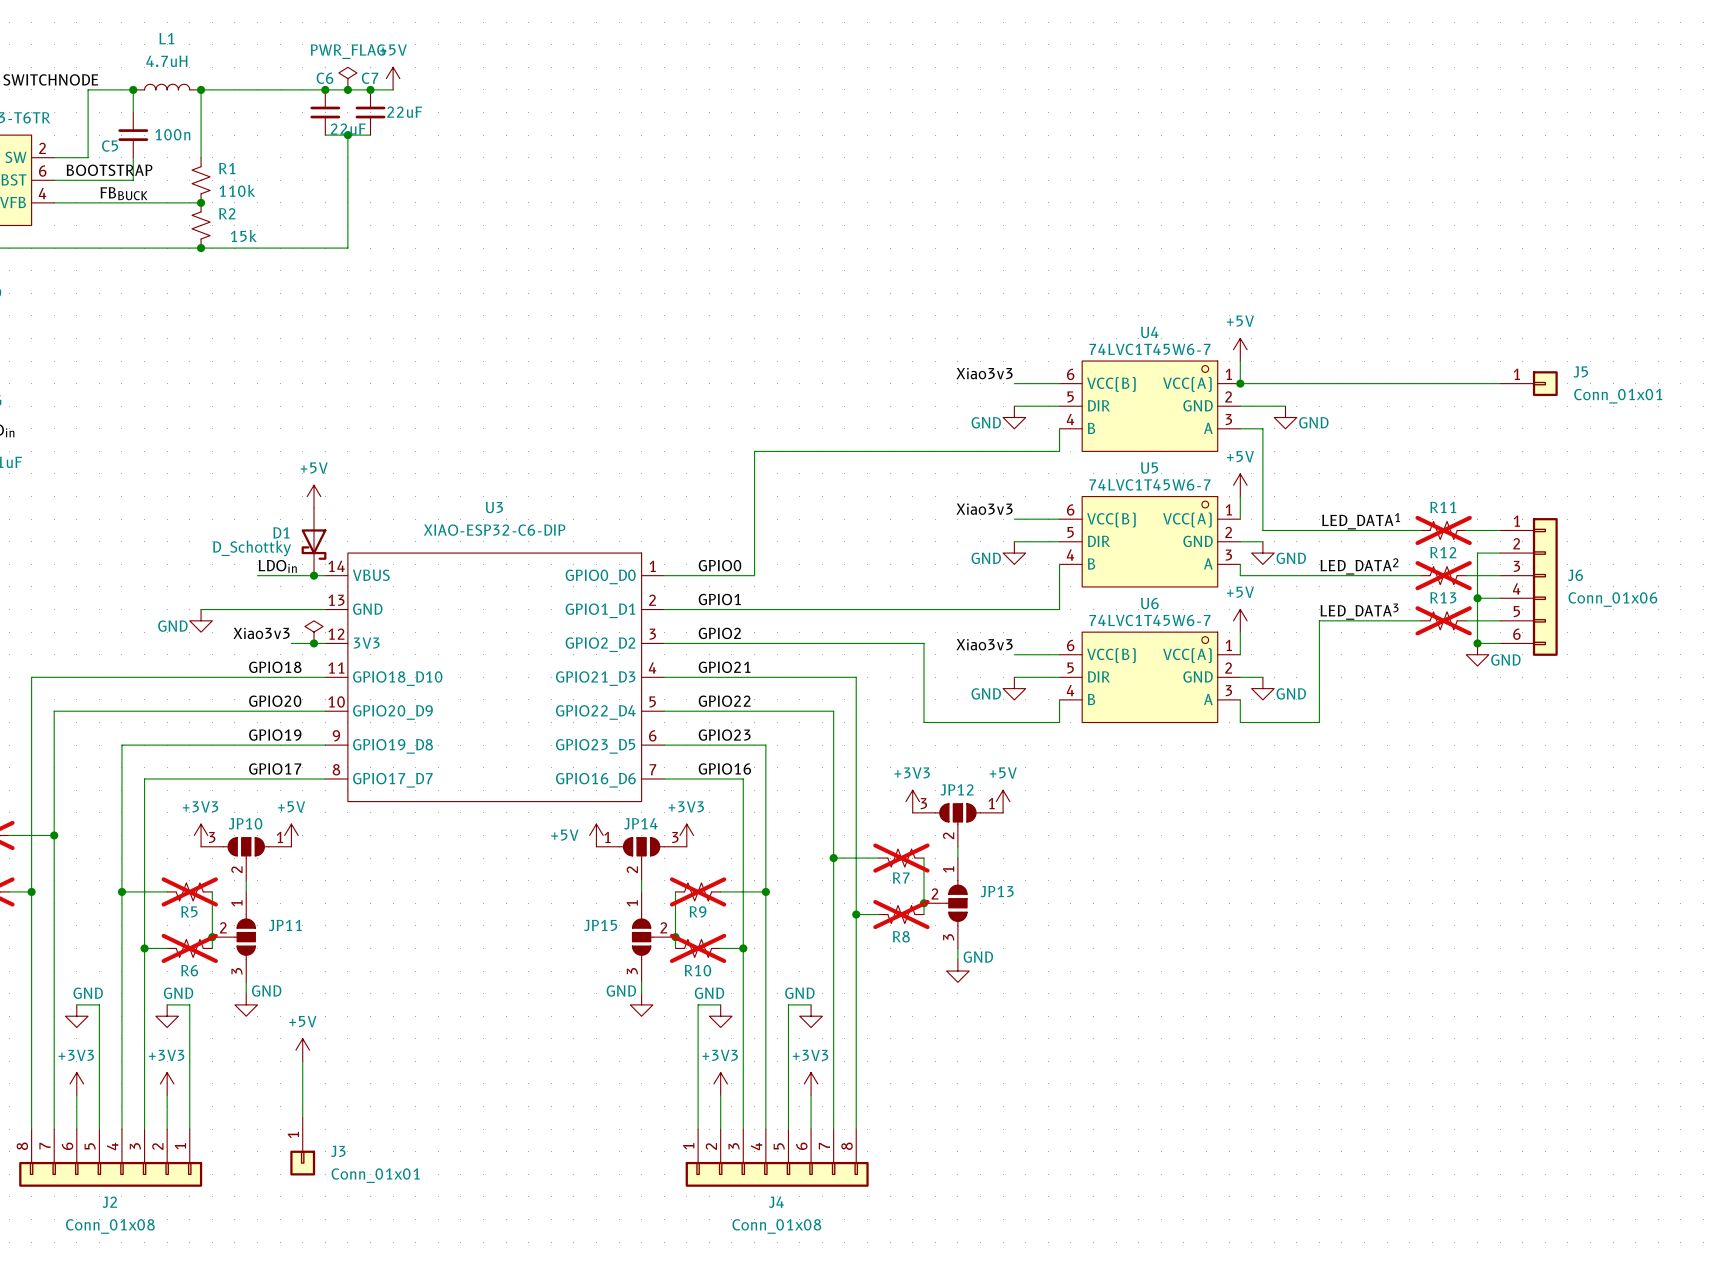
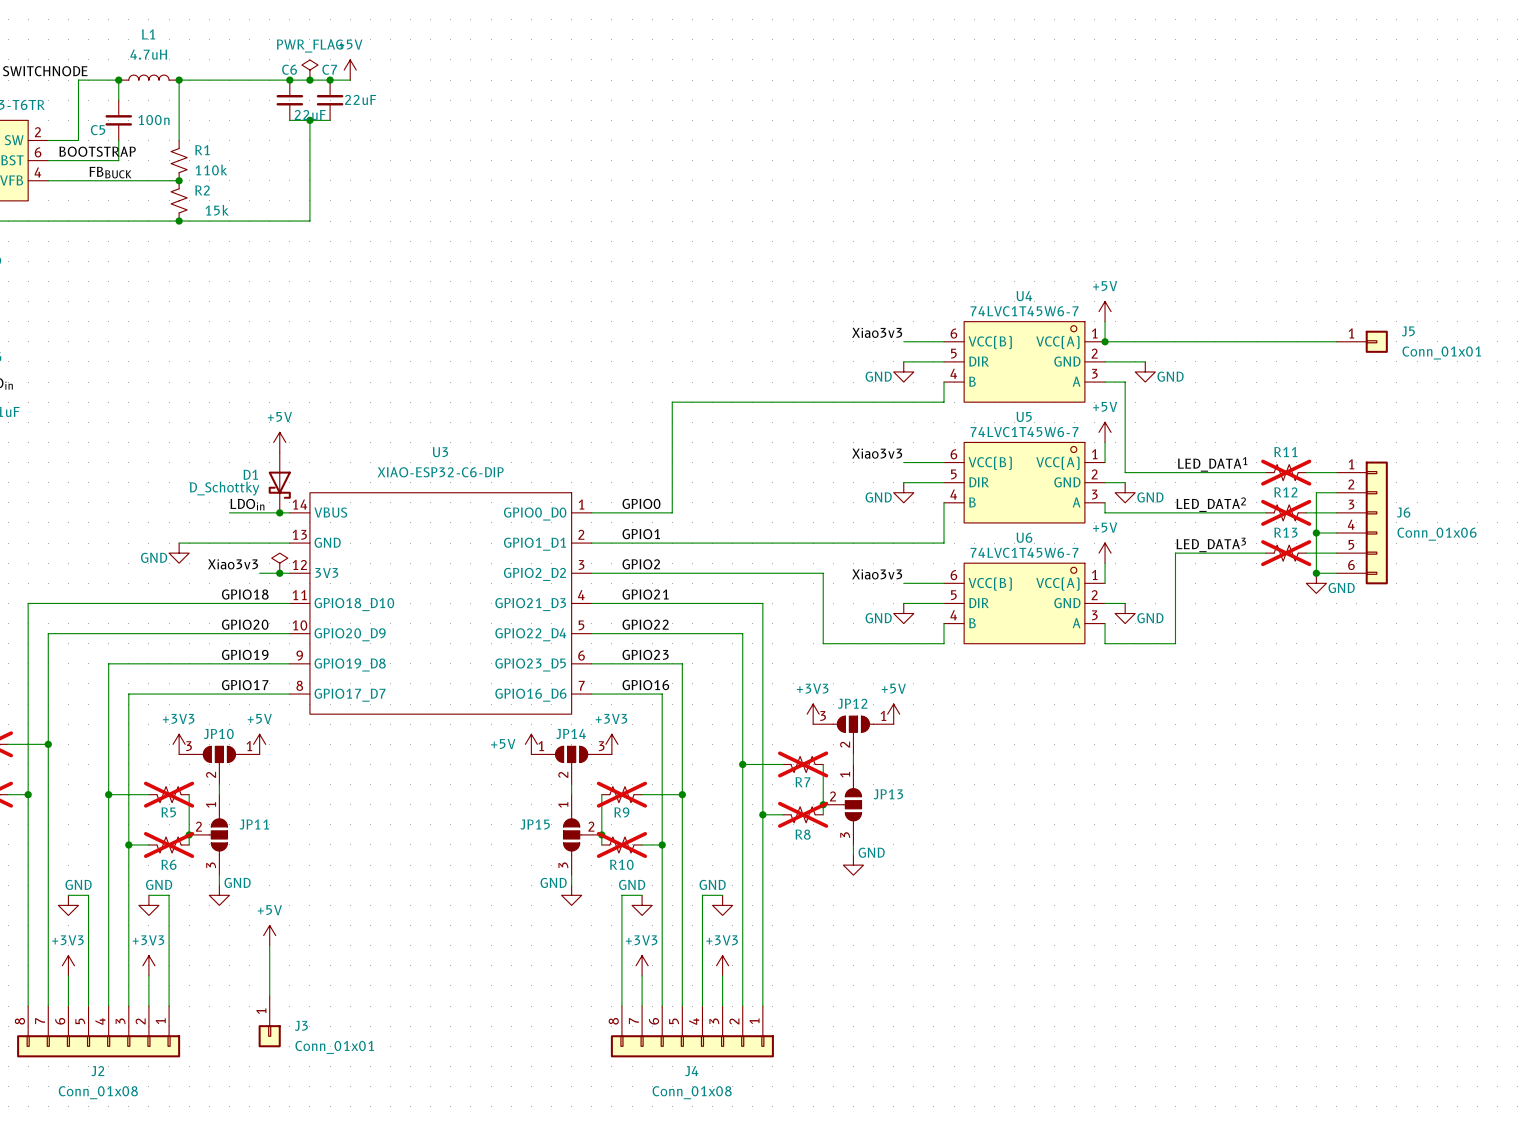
J4 flip: as is (777, 1174) -> left-right (692, 1046)

